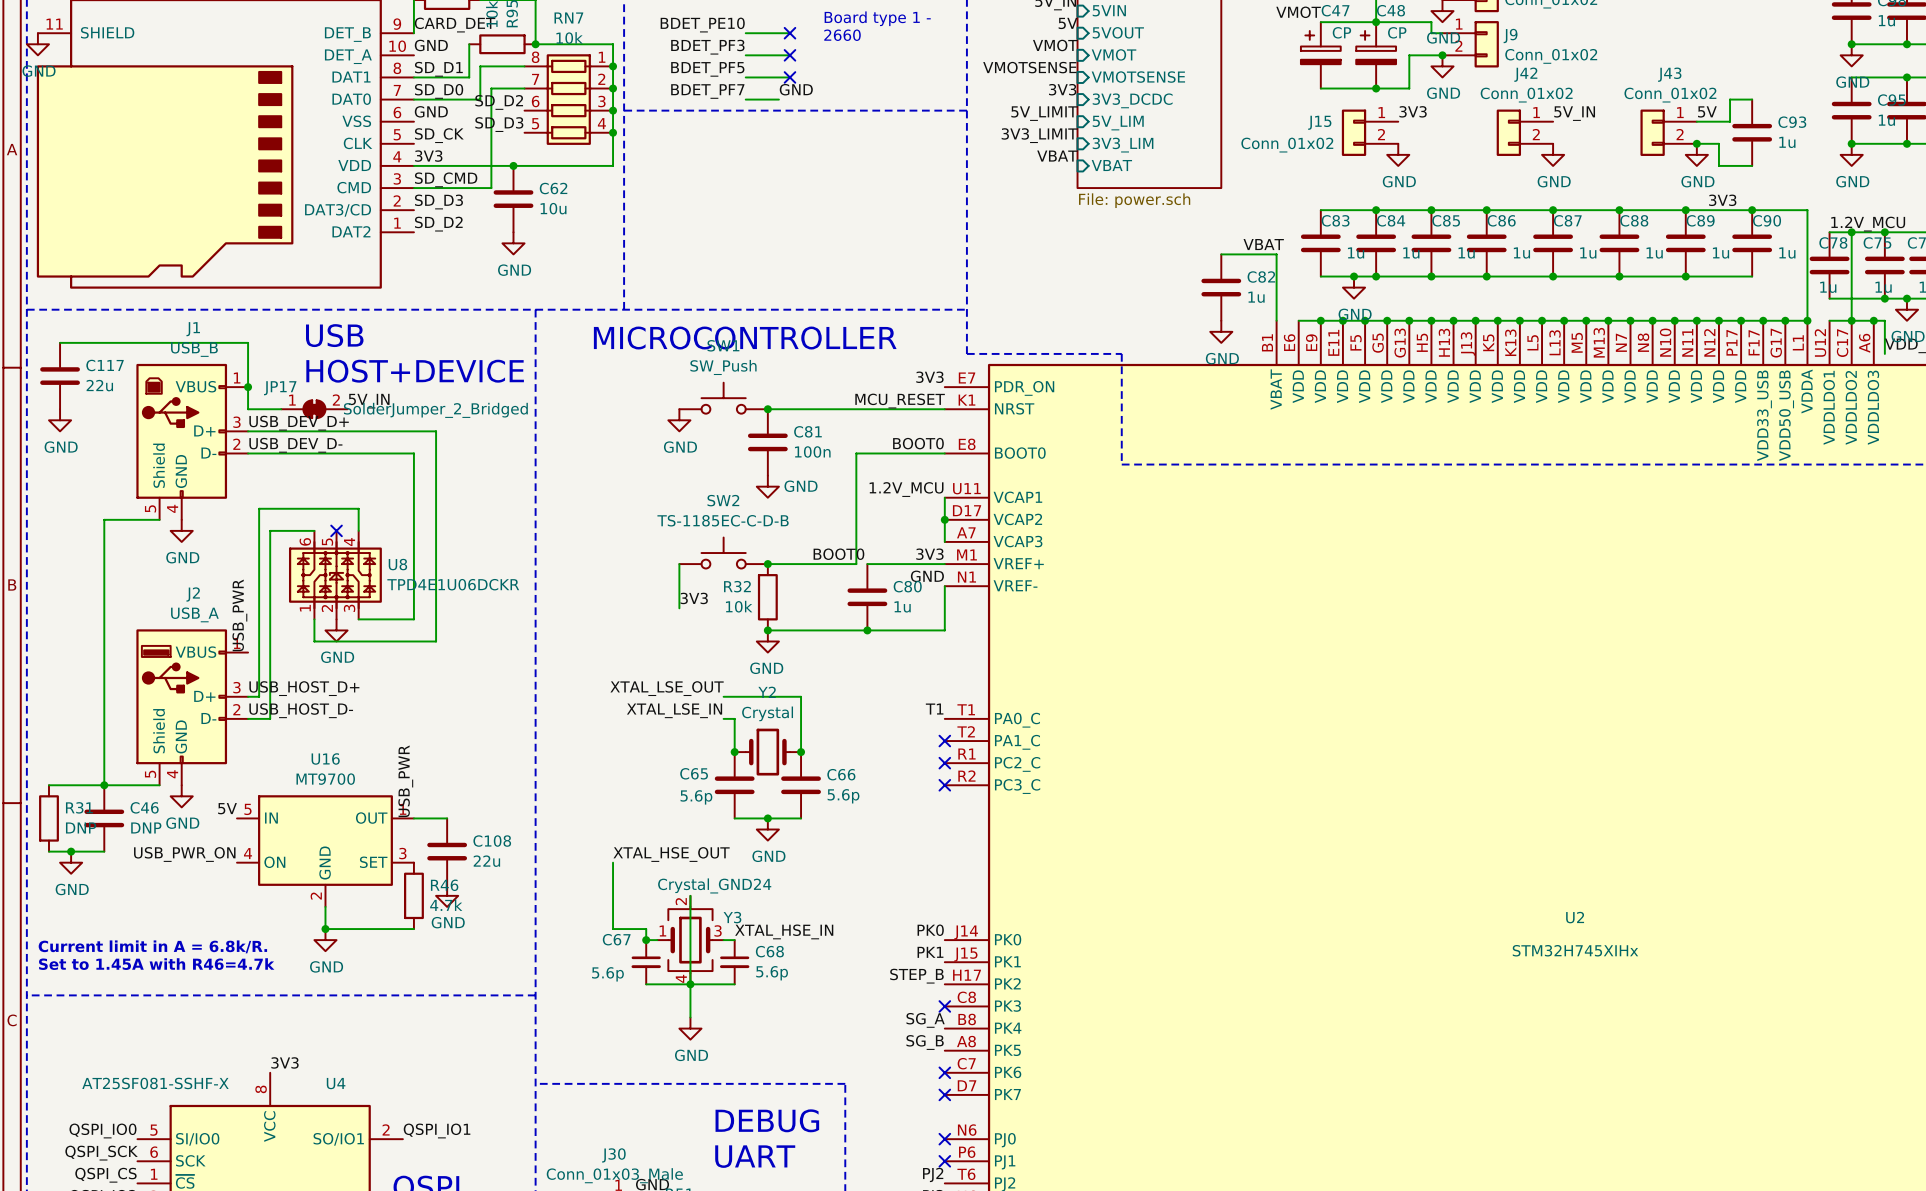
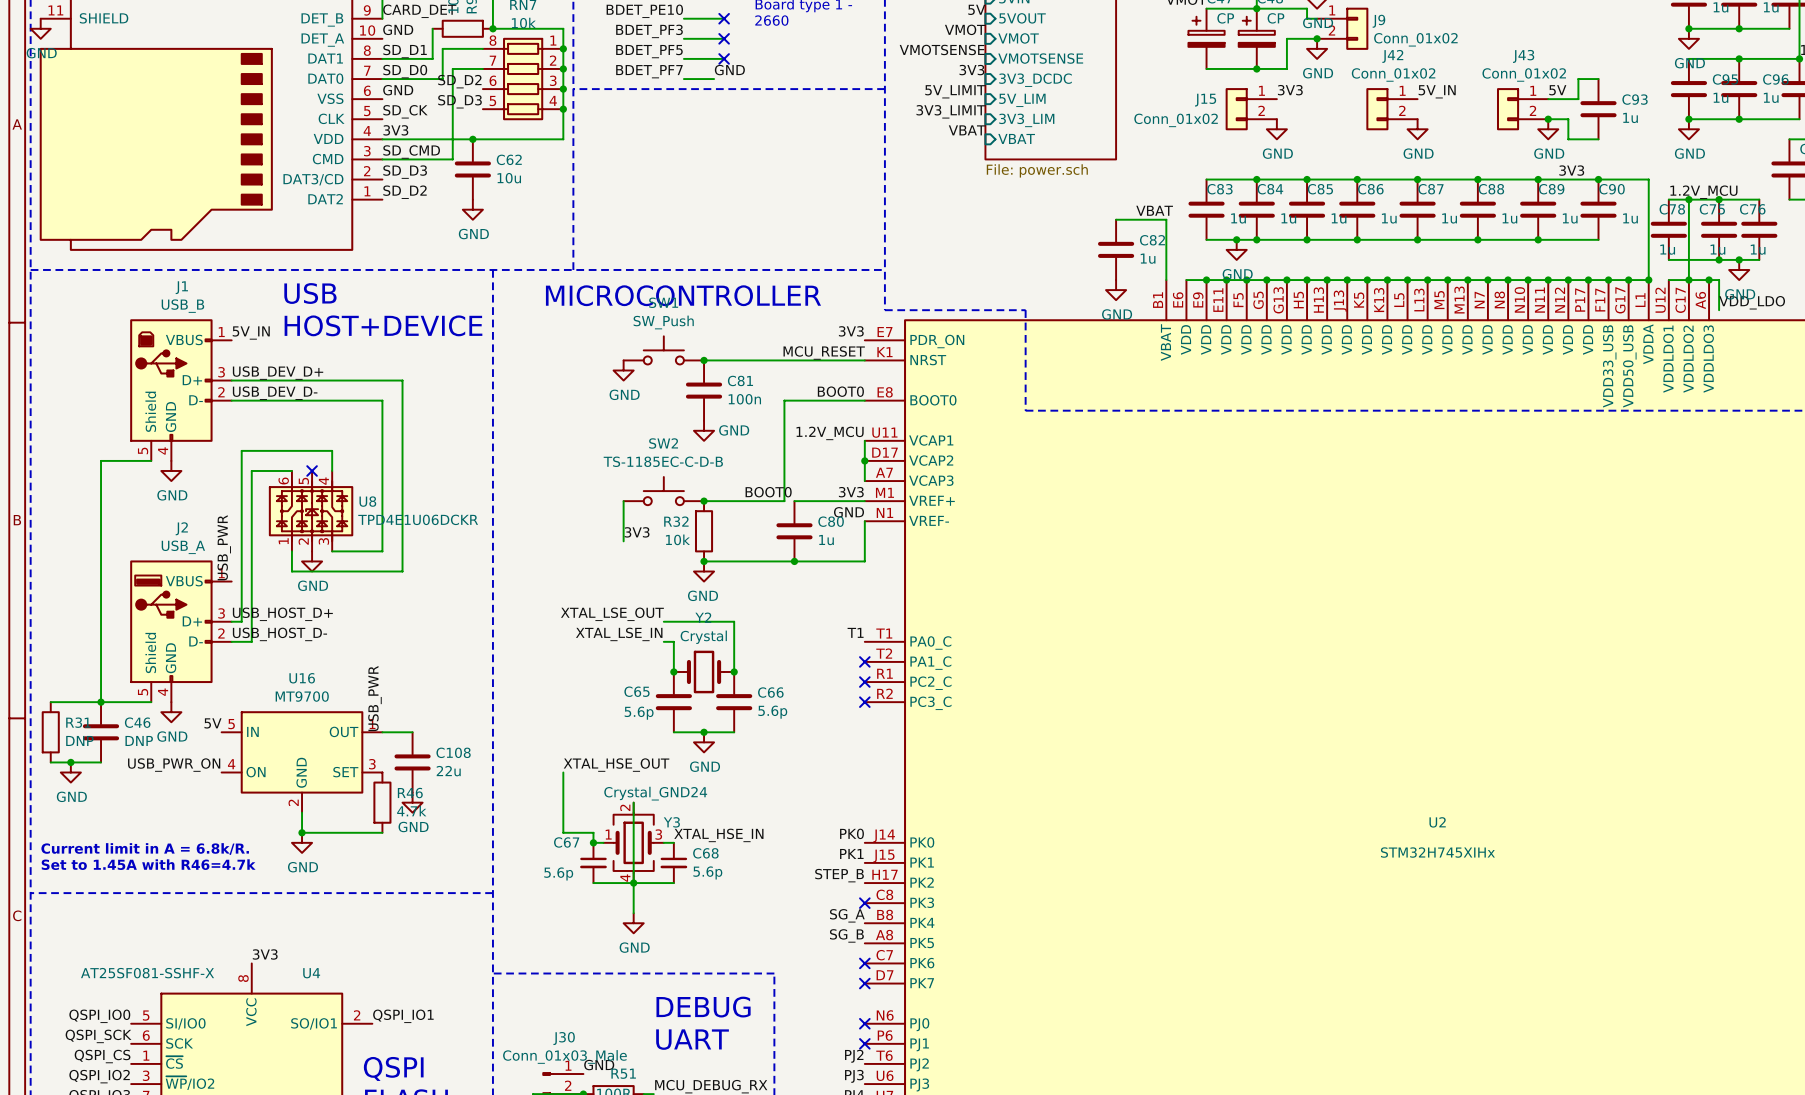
wire: (60, 342) (248, 342) (248, 409) (281, 409) -> none
C117: 22u (60, 376) -> none
junction: (248, 387) -> none
label position: 5V_IN (369, 401) -> 5V_IN (251, 332)
JP17: SolderJumper_2_Bridged (314, 409) -> none
power symbol: GND (60, 420) -> none

